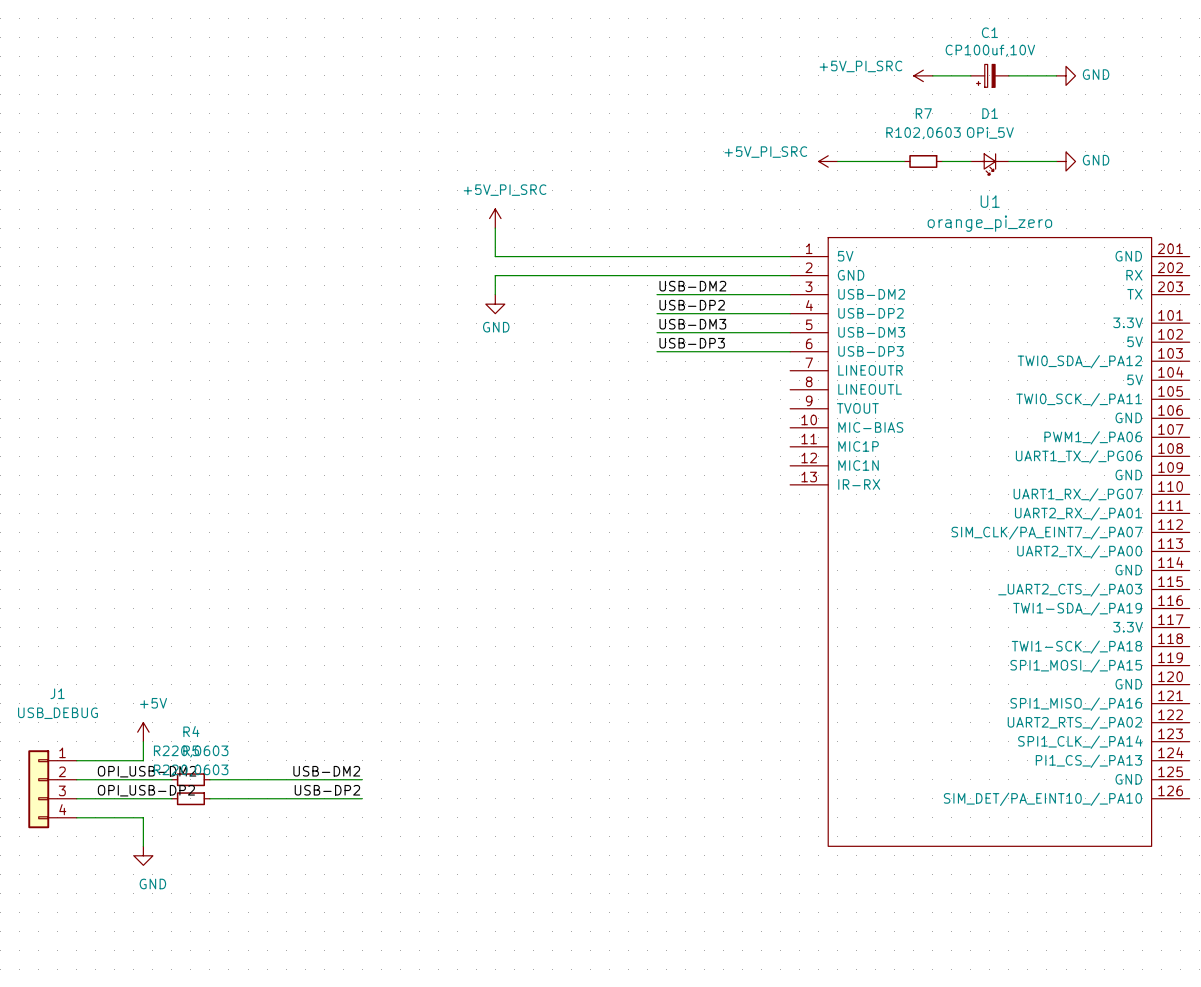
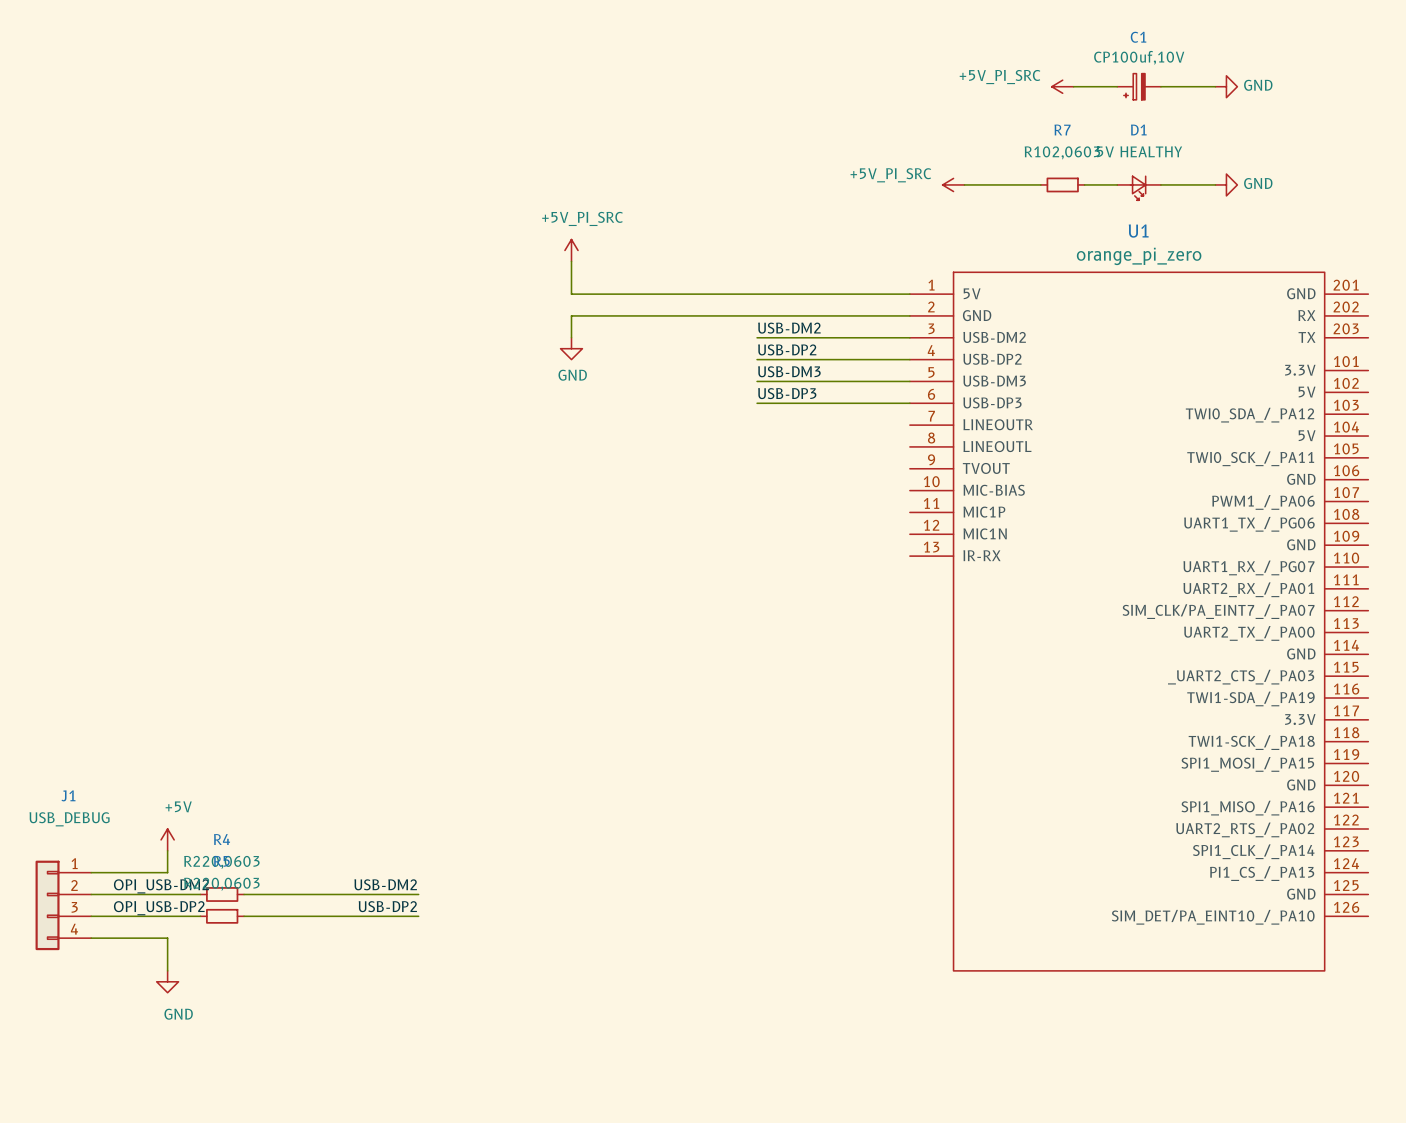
D1 value: OPi_5V (990, 133) -> 5V HEALTHY (1139, 151)

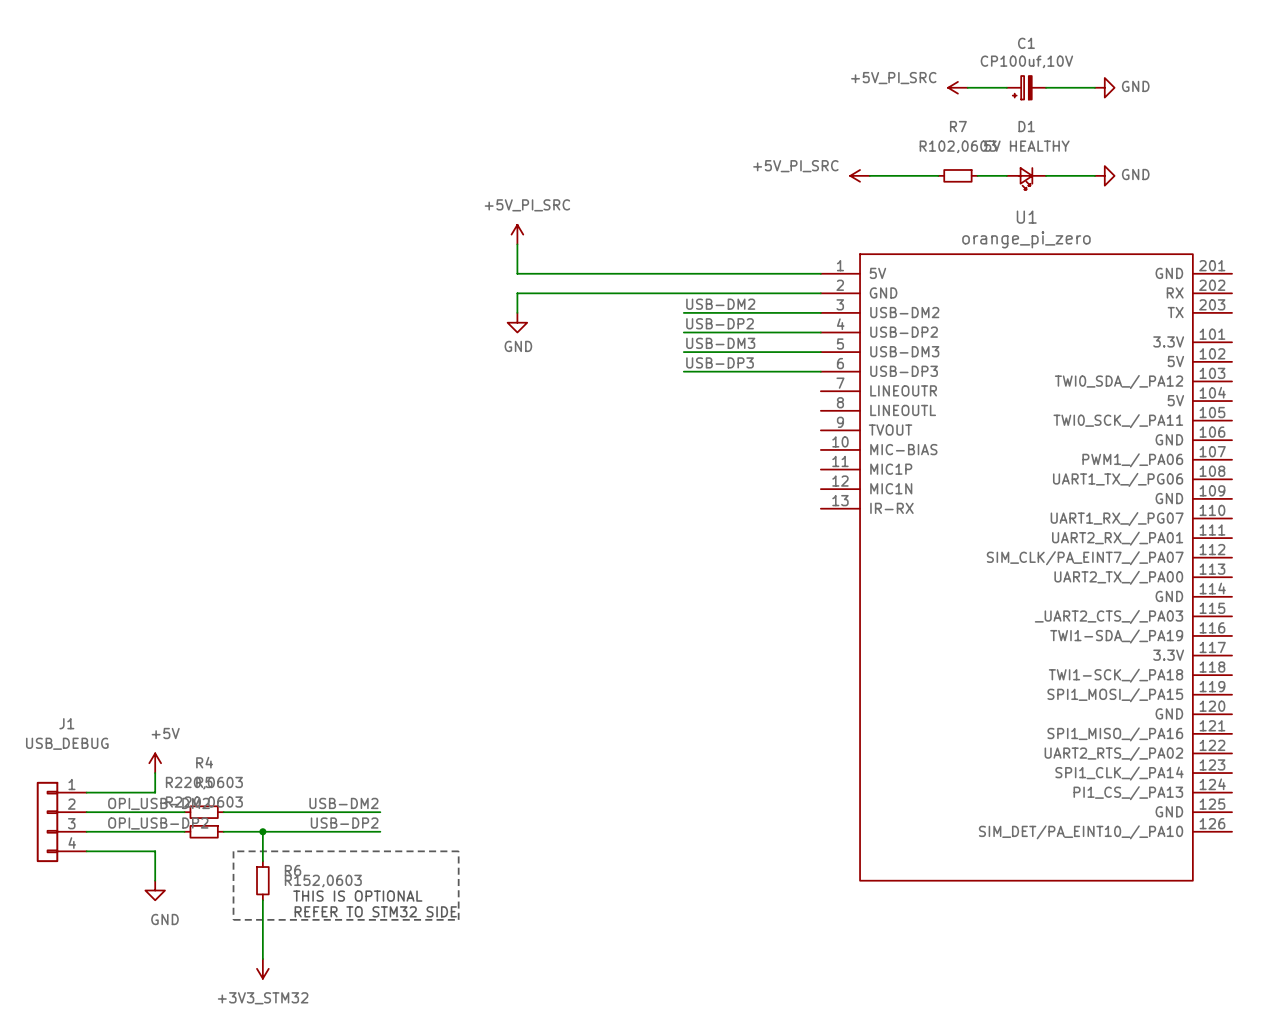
wire: none -> (262, 831) (262, 861)
junction: none -> (262, 831)
line: none -> (233, 851) (233, 919) (458, 919) (458, 851) (233, 851)
R6: none -> R152,0603 (262, 880)
text: none -> THIS IS OPTIONAL (357, 896)
wire: none -> (262, 900) (262, 959)
text: none -> REFER TO STM32 SIDE (375, 911)
power symbol: none -> +3V3_STM32 (262, 968)

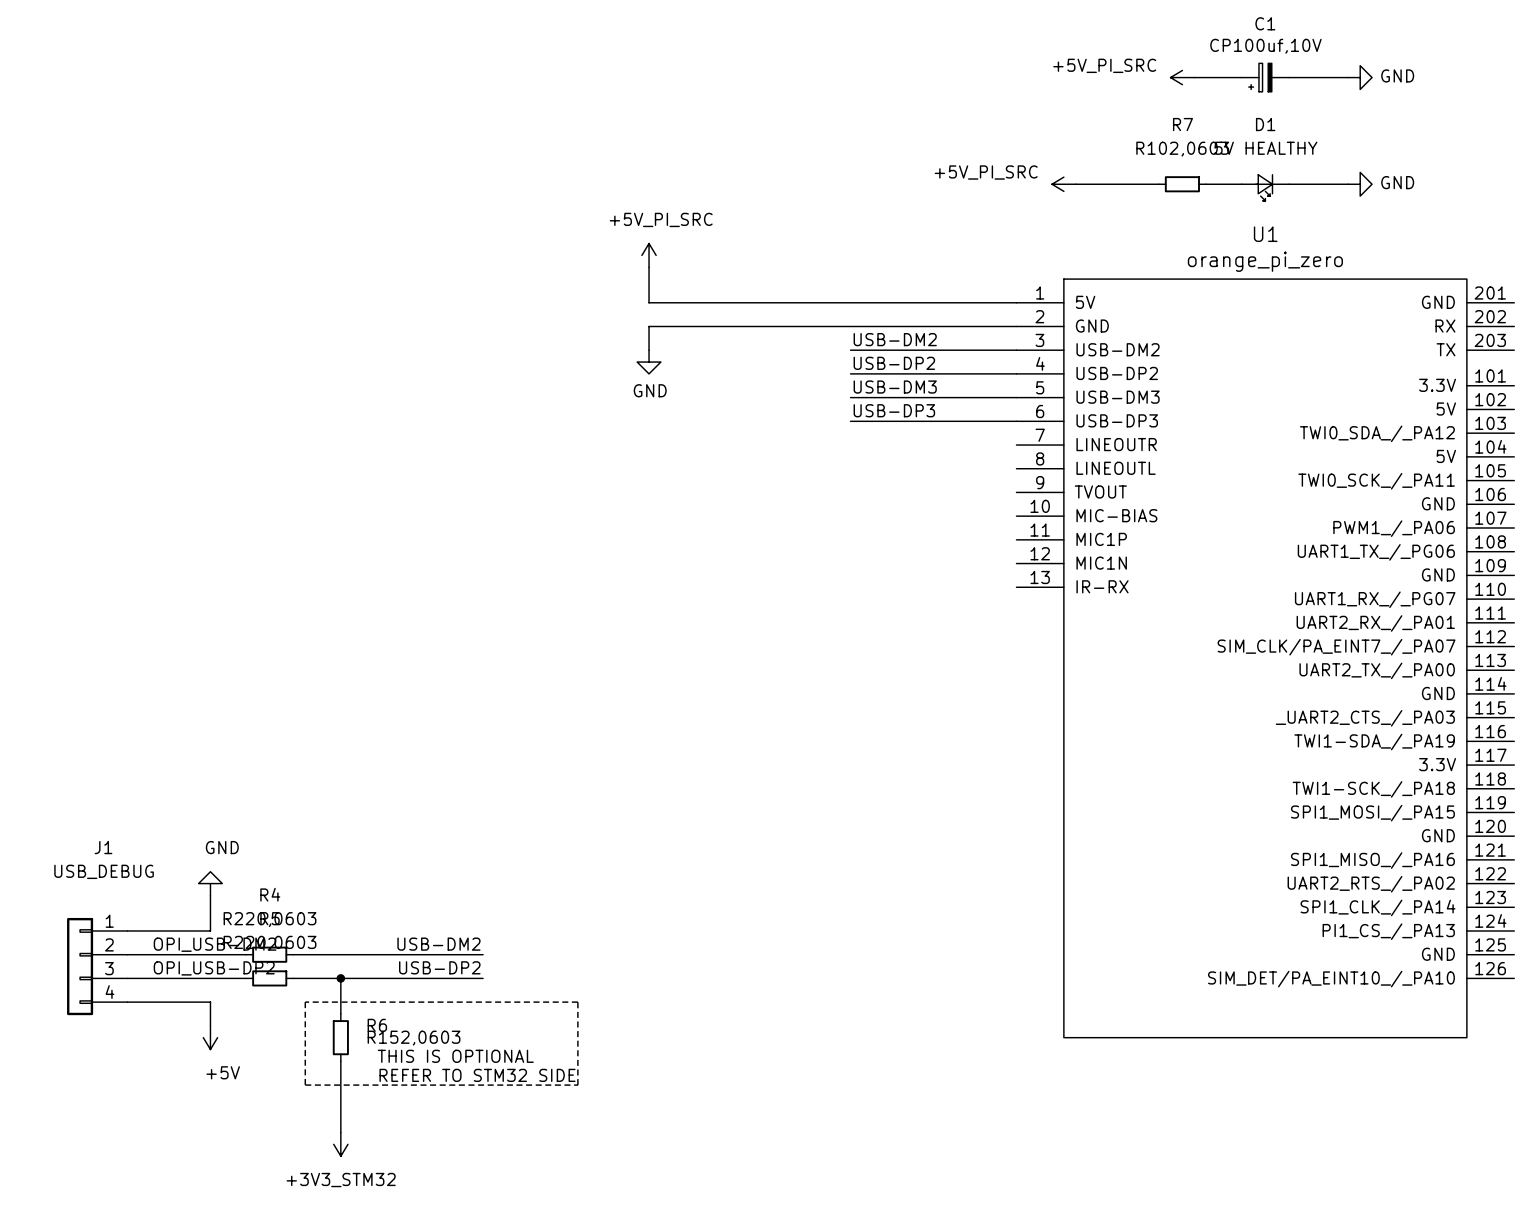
power symbol text position: +5V (165, 733) -> +5V (223, 1072)
power symbol rotation: 0° (155, 763) -> 180° (210, 1037)
power symbol position: +5V (155, 763) -> +5V (210, 1037)
power symbol rotation: 0° (155, 890) -> 180° (210, 883)
power symbol position: GND (155, 890) -> GND (210, 883)
power symbol text position: GND (164, 919) -> GND (222, 847)

